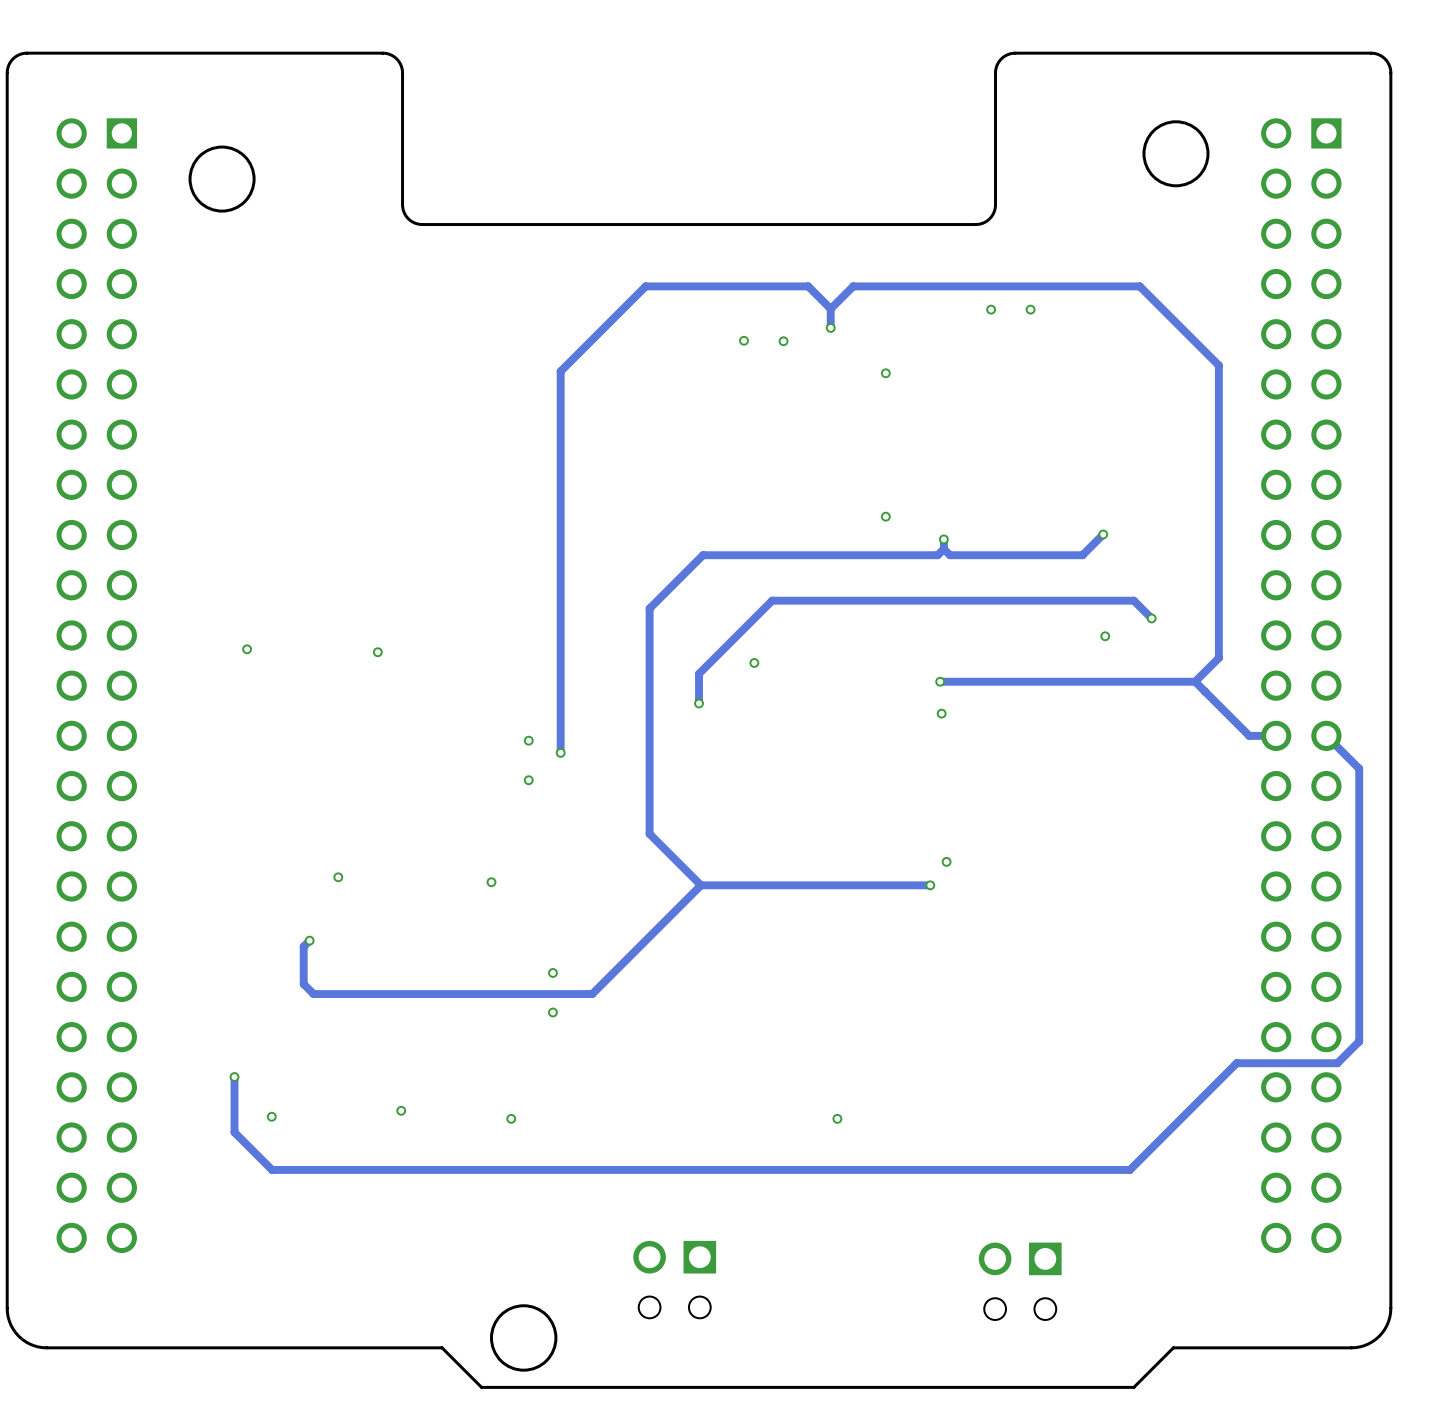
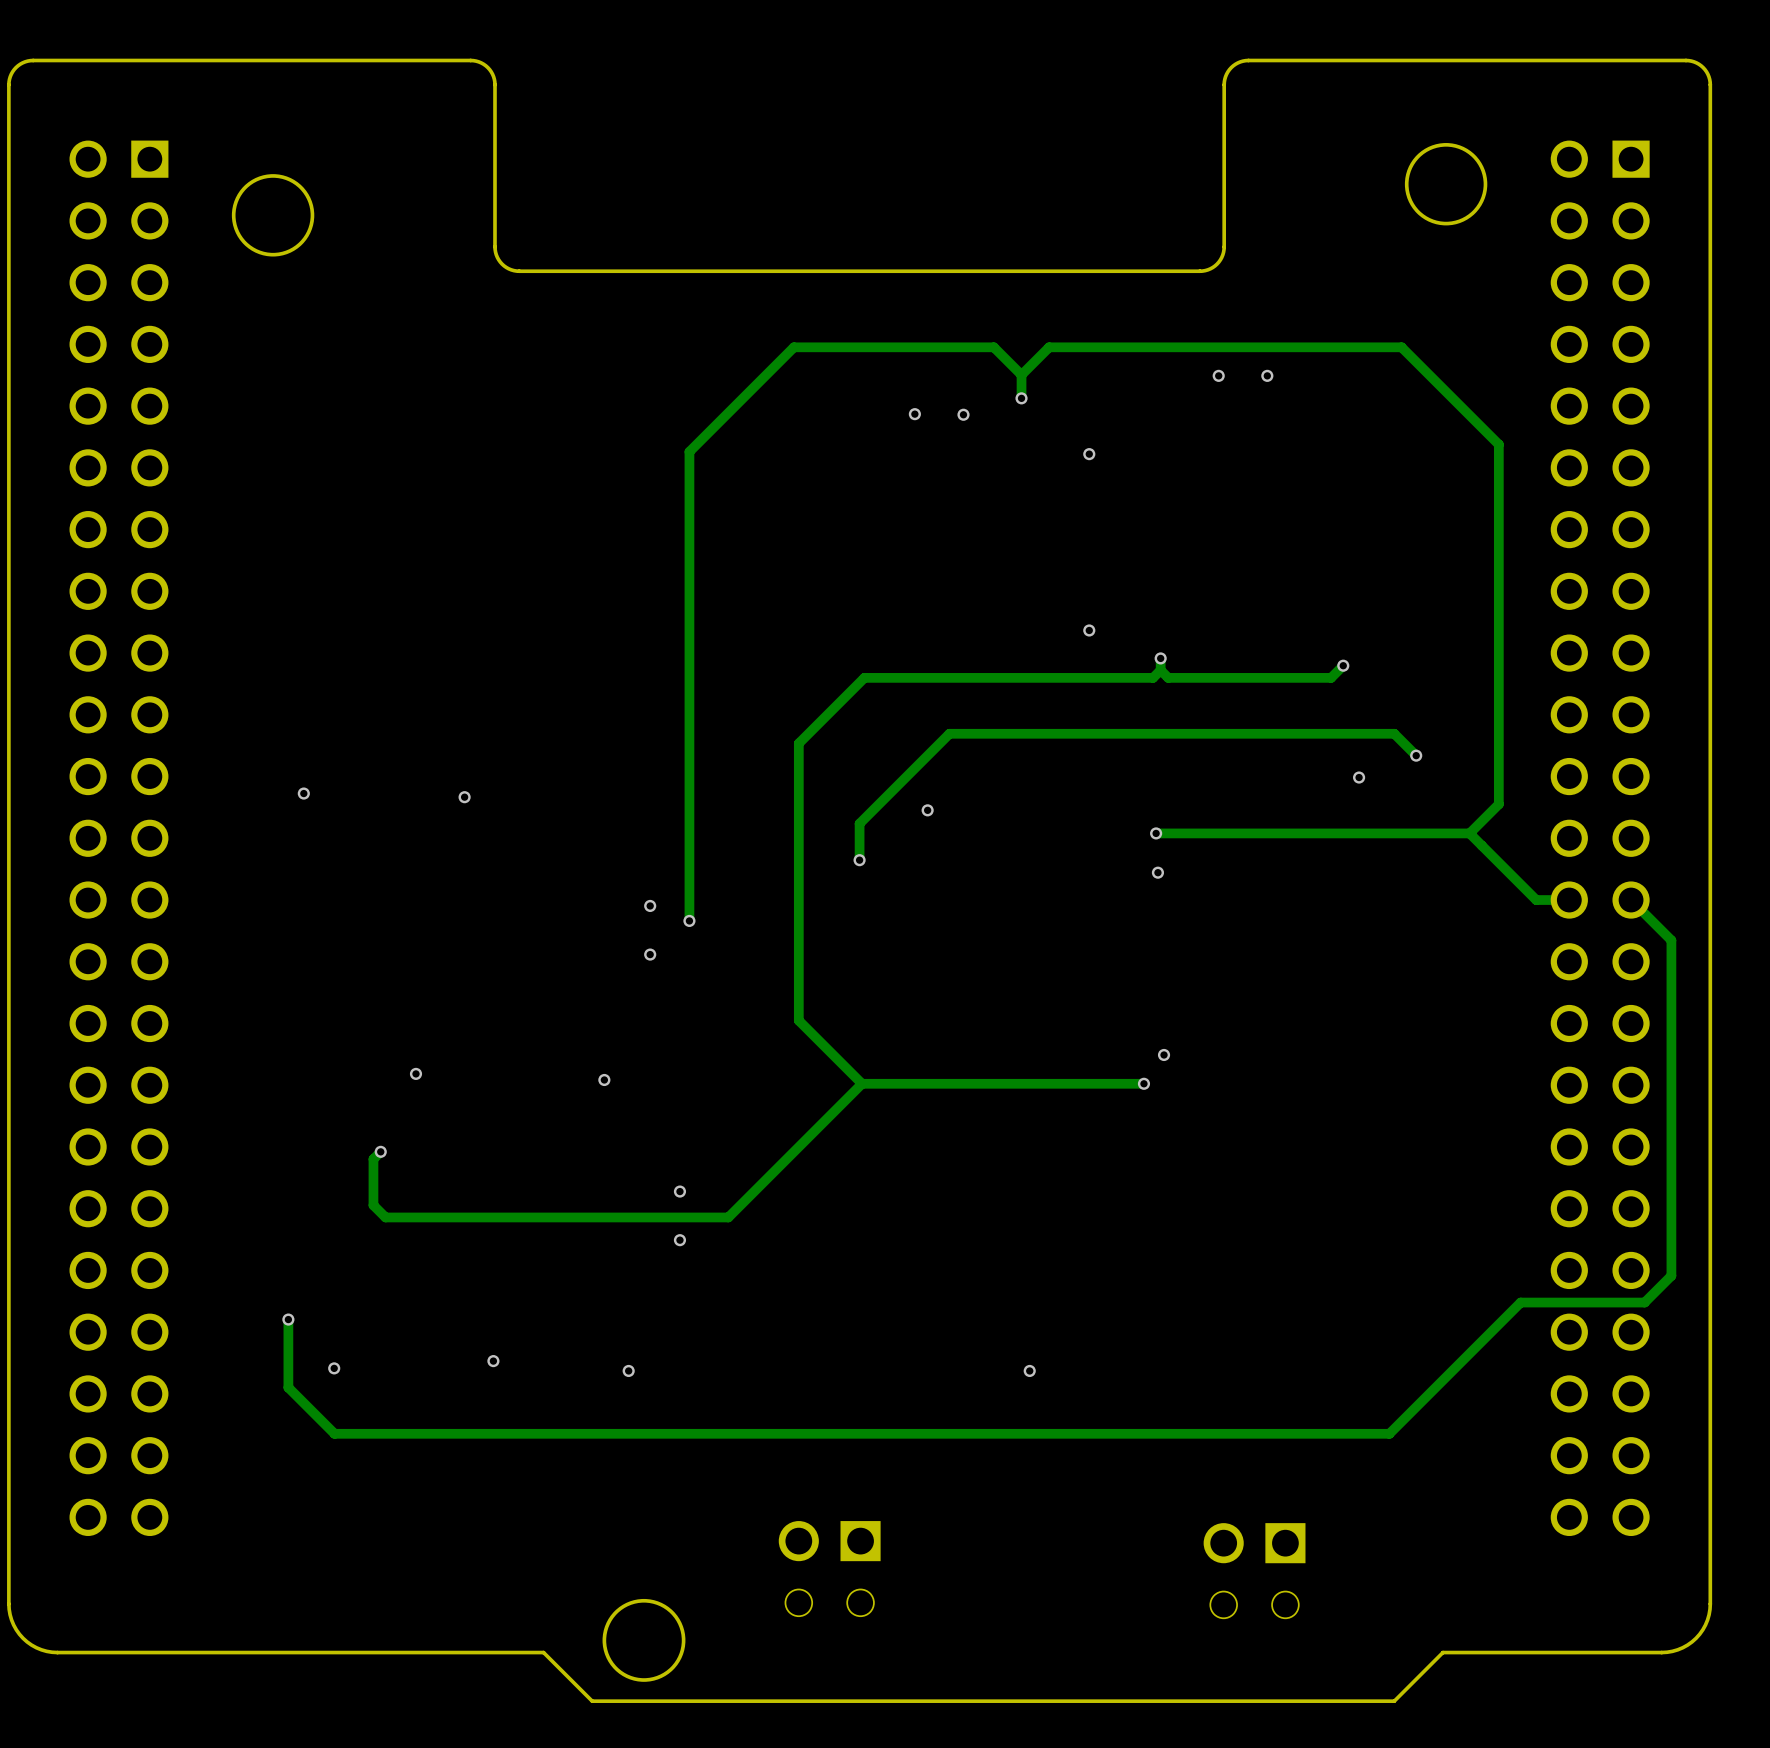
track: (1103, 534) (1092, 545) -> none
via position: (1103, 534) -> (1343, 665)

